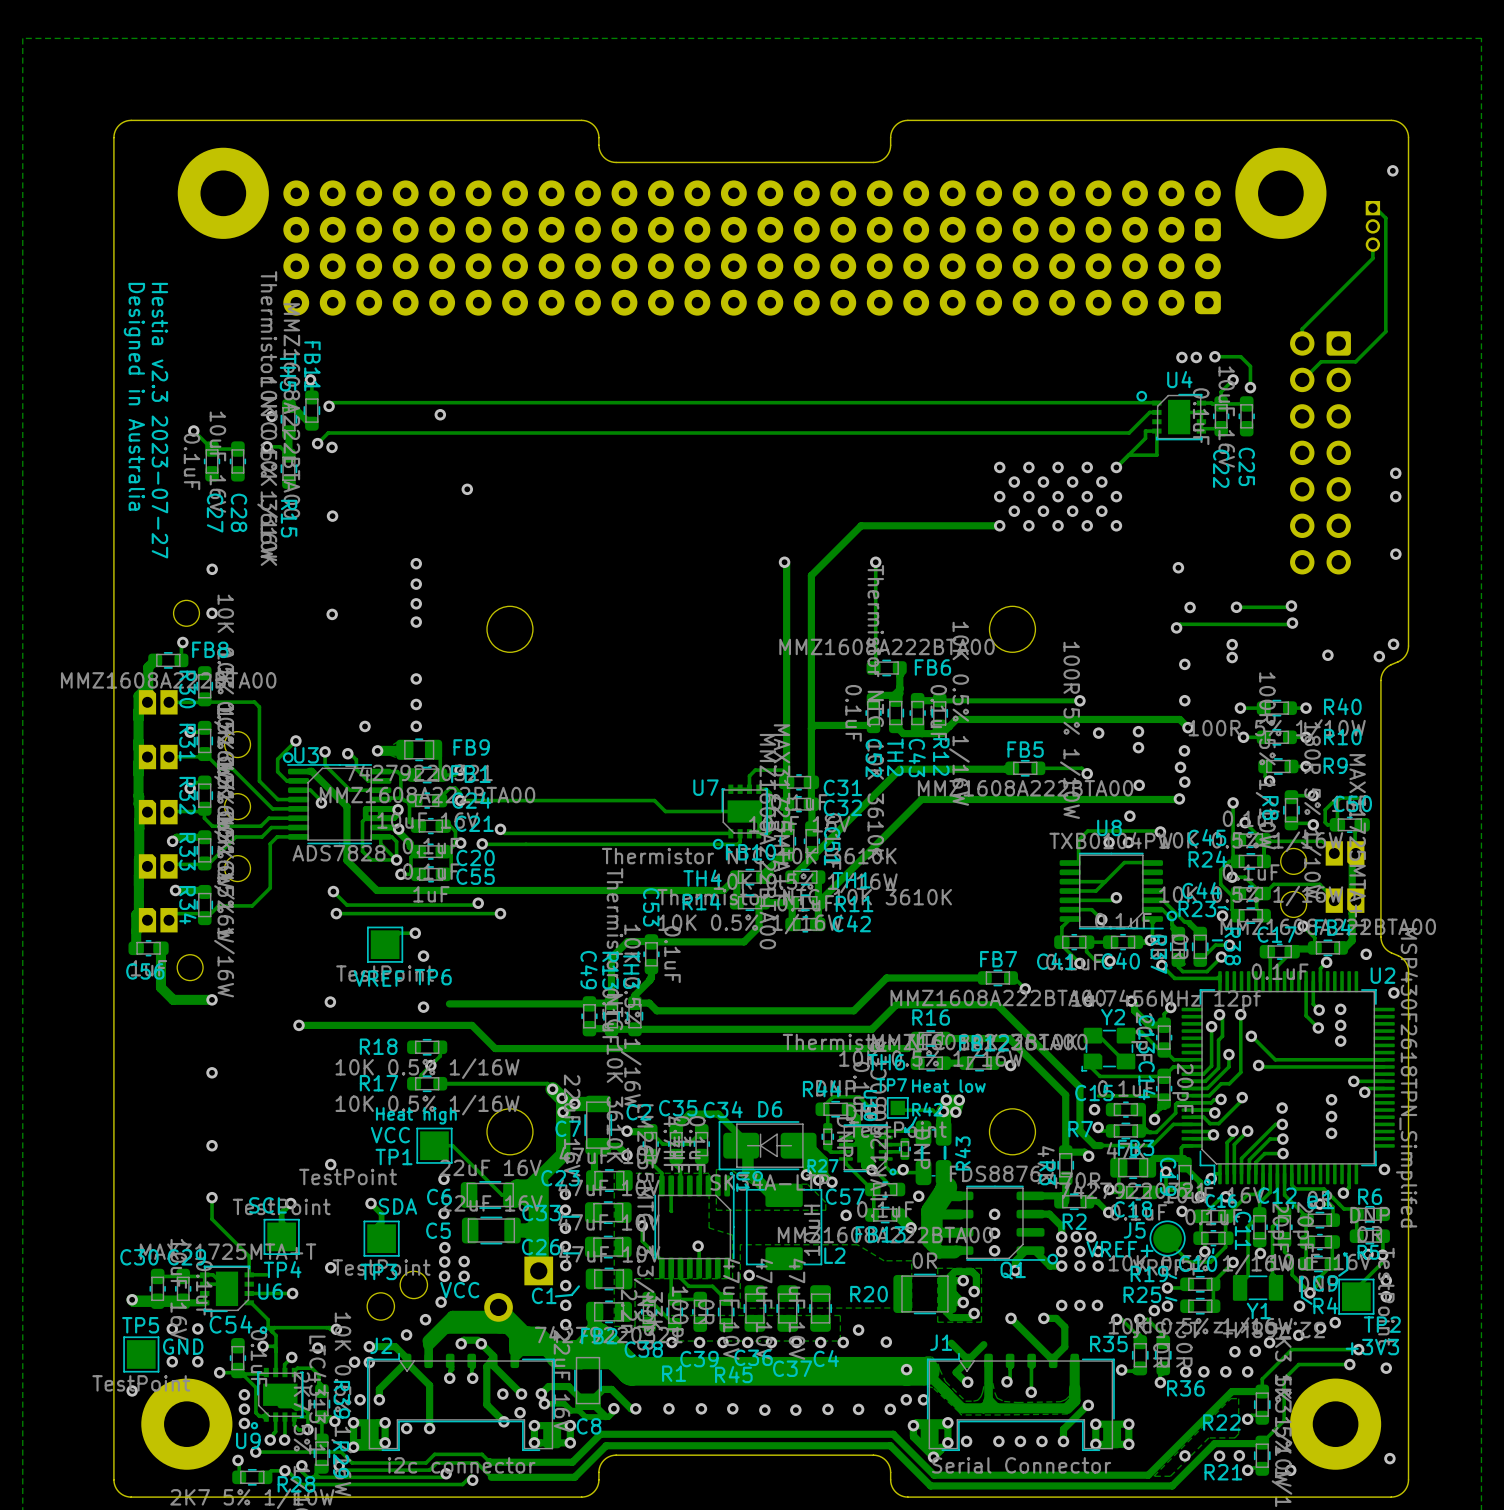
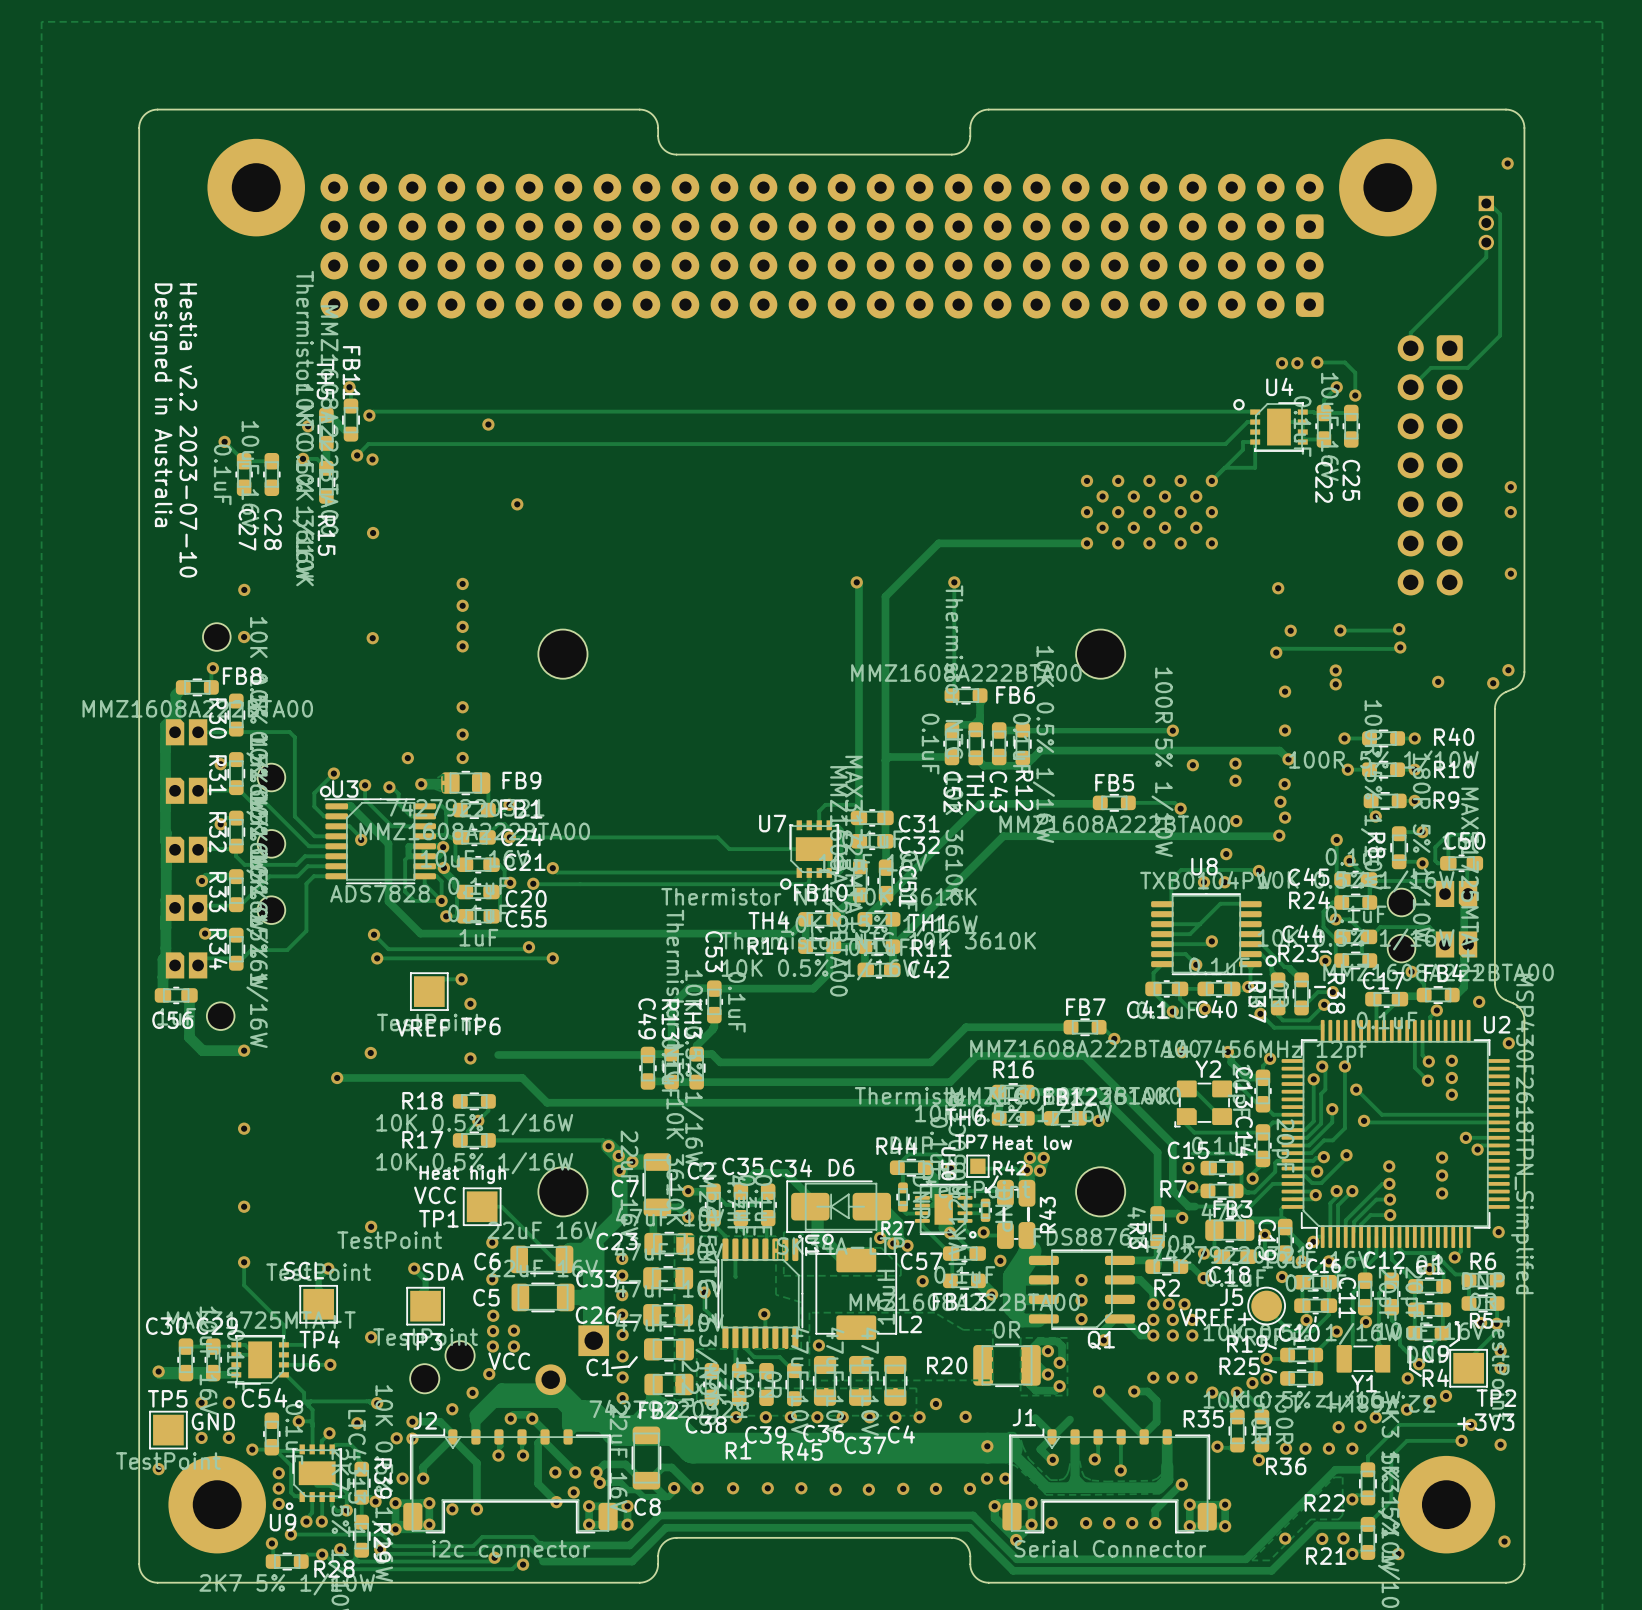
text: Hestia v2.3 2023-07-27 (159, 420) -> Hestia v2.2 2023-07-10 (188, 430)

